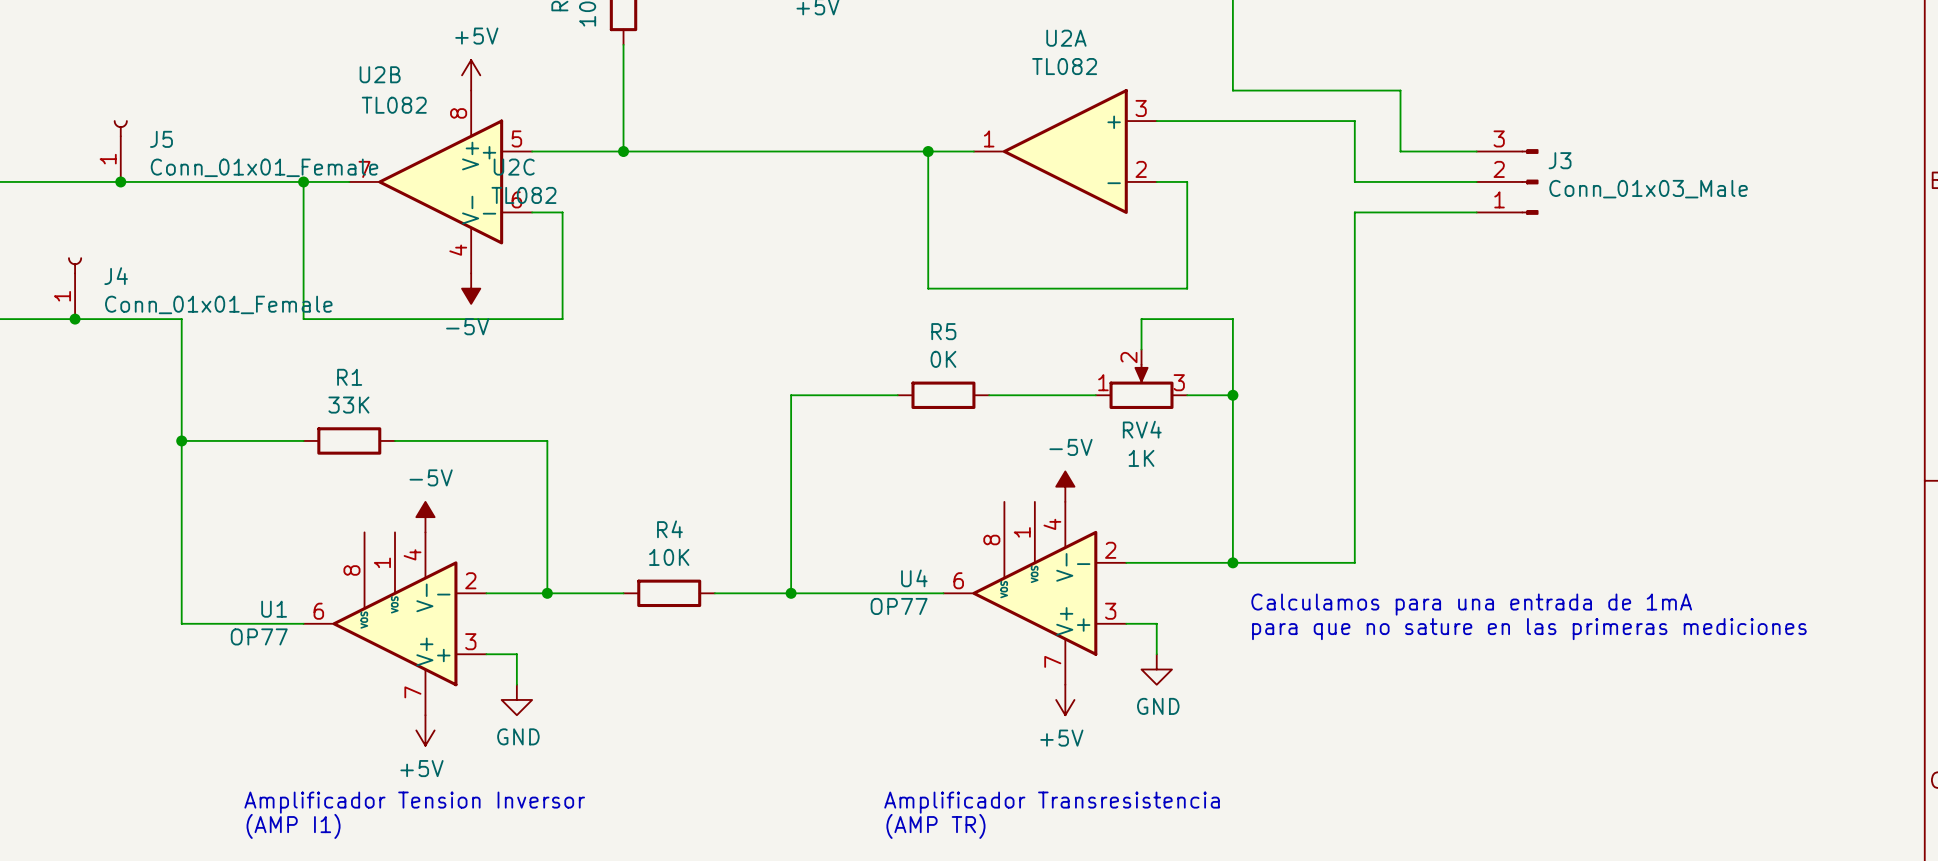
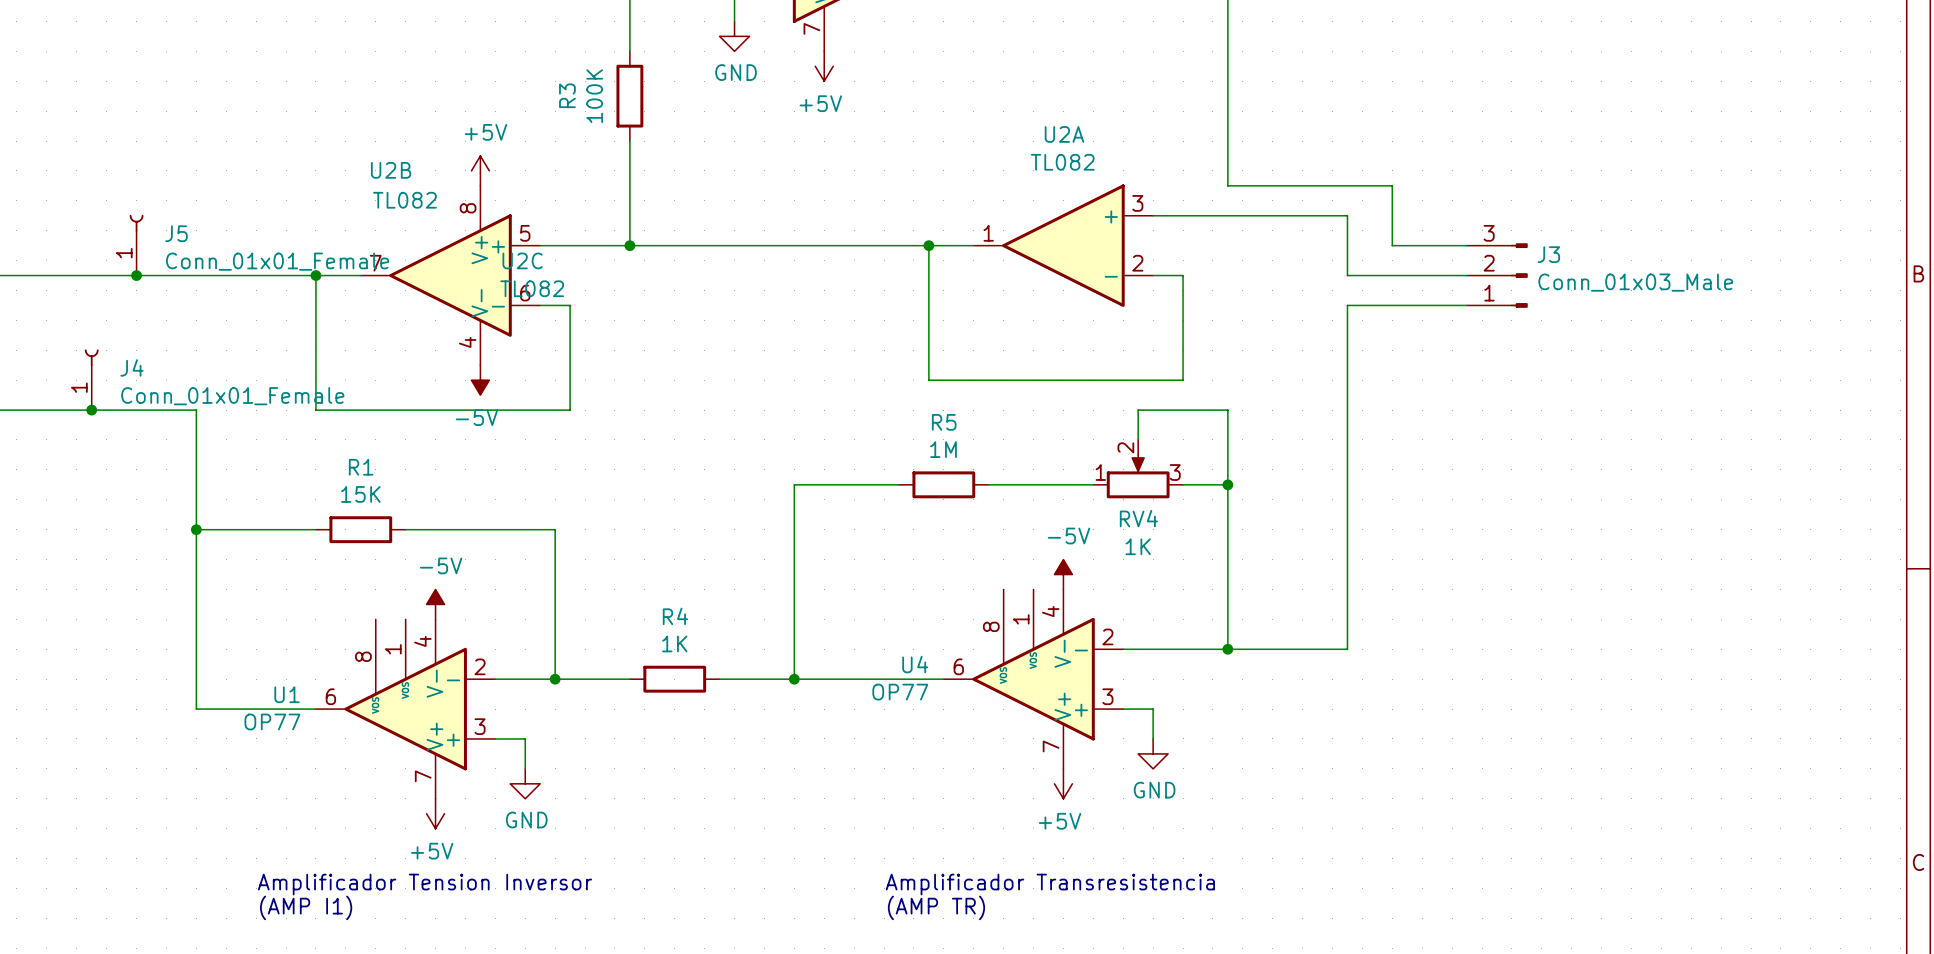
R5 value: 0K (943, 359) -> 1M (943, 449)
R1 value: 33K (348, 405) -> 15K (360, 494)
R4 value: 10K (669, 557) -> 1K (674, 643)
text: Calculamos para una entrada de 1mA (1471, 604) -> none
text: para que no sature en las primeras mediciones (1529, 629) -> none

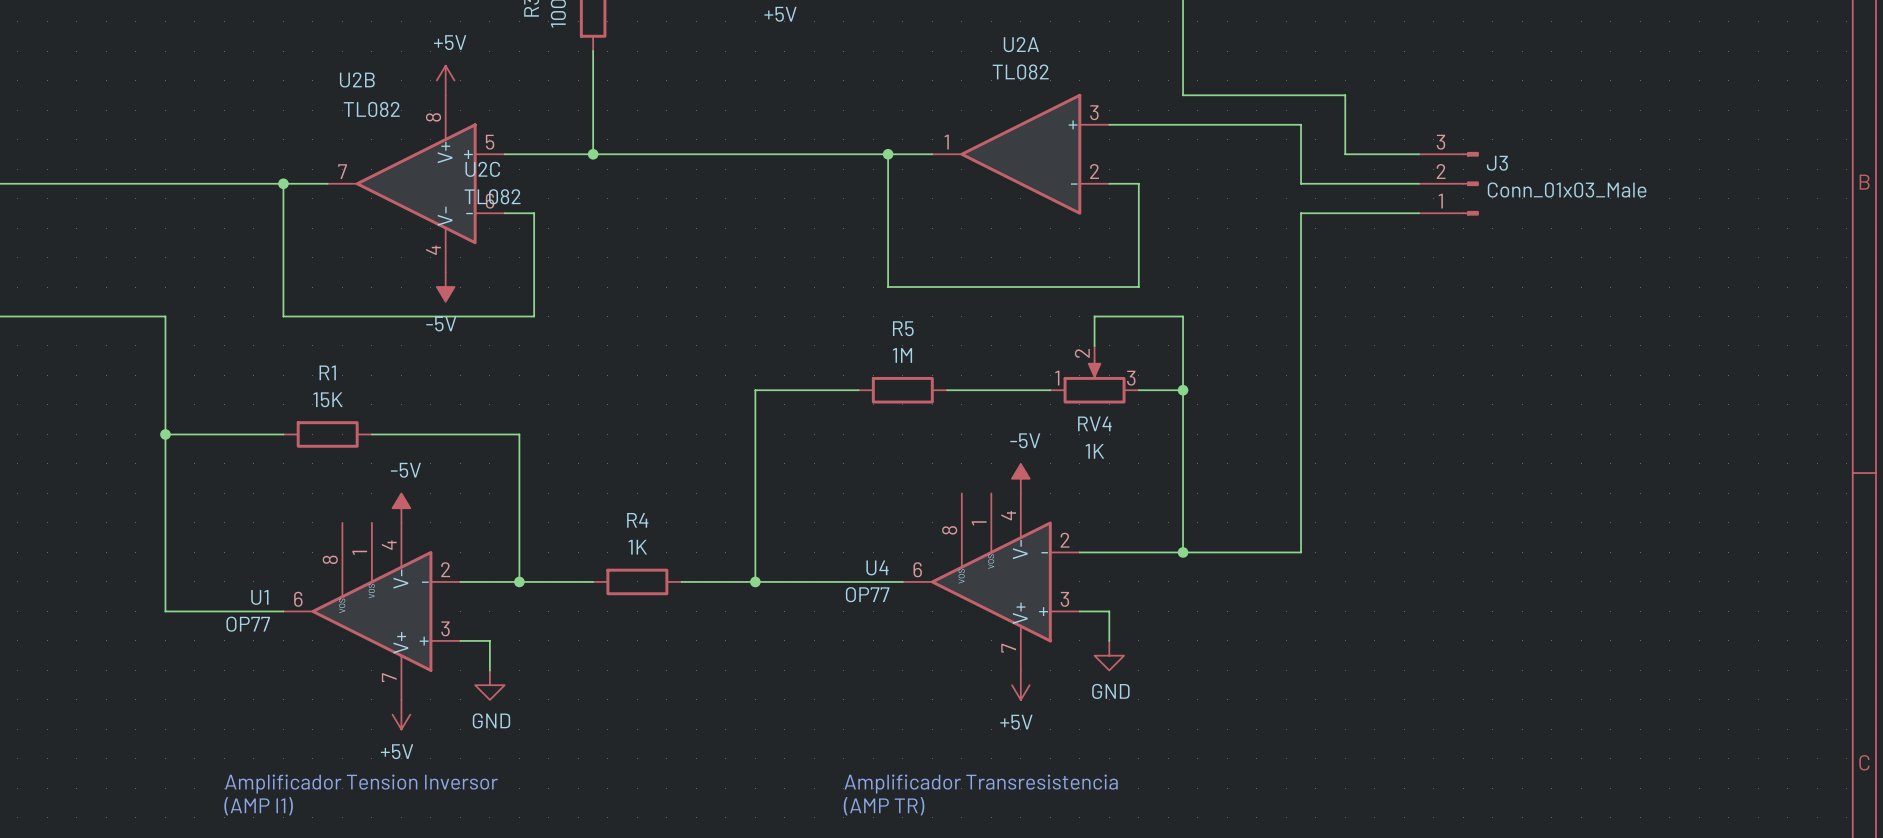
J5: Conn_01x01_Female (136, 245) -> none
junction: (136, 275) -> none
J4: Conn_01x01_Female (91, 379) -> none
junction: (91, 410) -> none

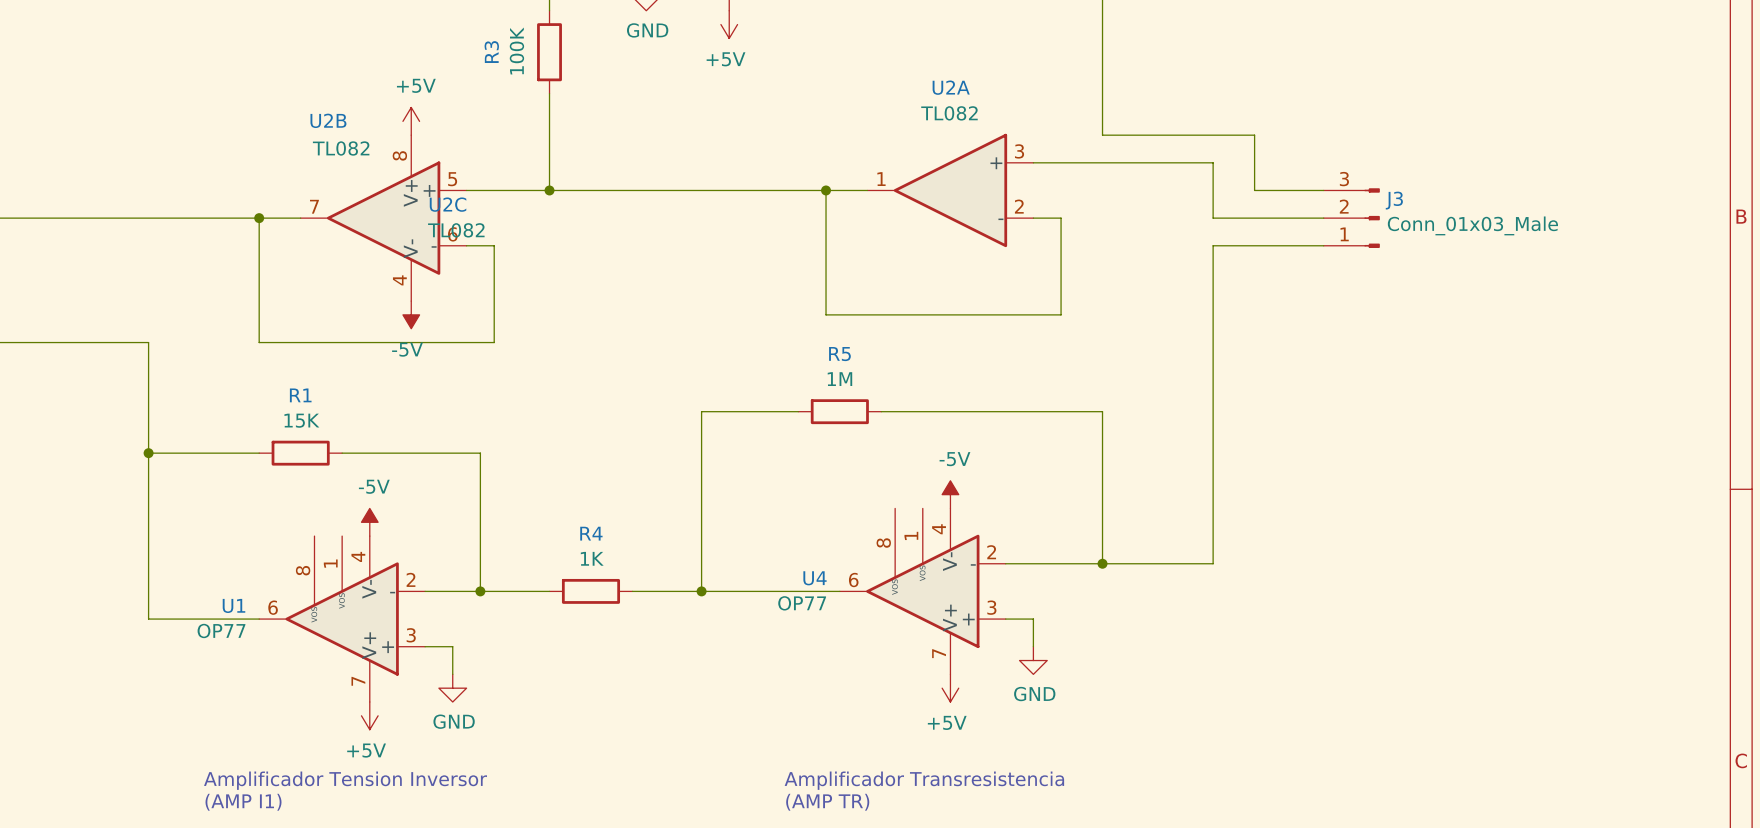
wire: (1094, 345) (1094, 316) (1183, 316) (1183, 390) -> none
RV4: 1K (1094, 374) -> none
wire: none -> (978, 411) (1061, 411)
junction: (1183, 390) -> none

